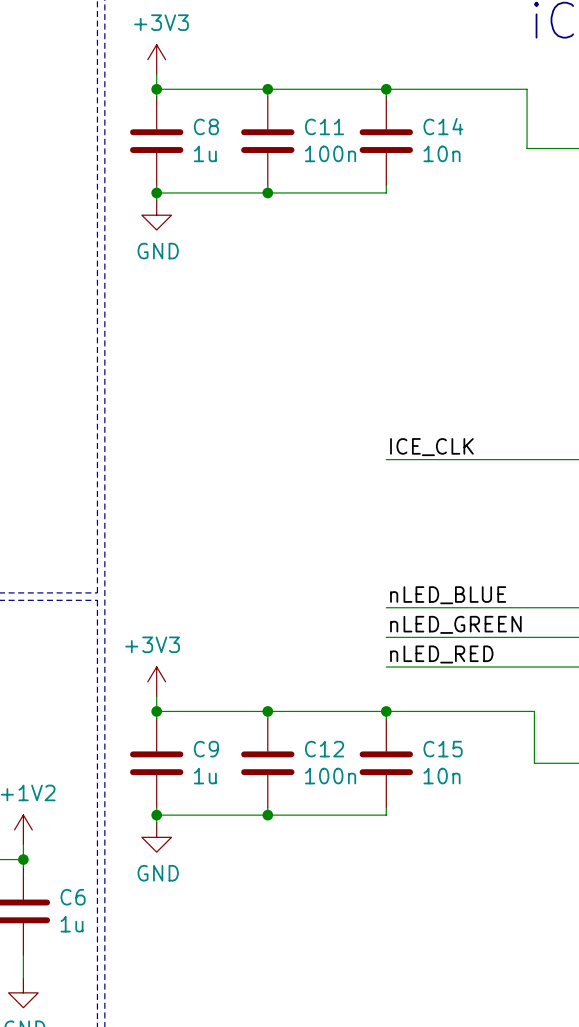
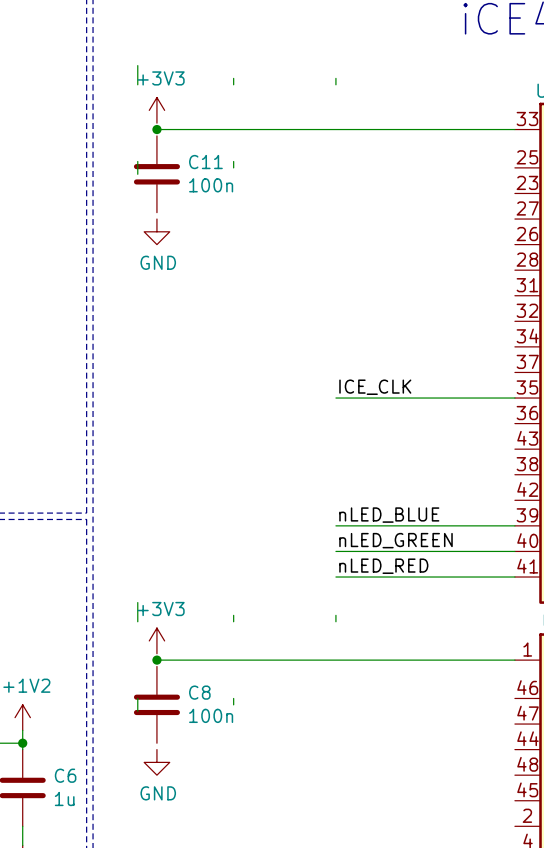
power symbol position: +3V3 (156, 59) -> +3V3 (156, 110)
wire: (156, 89) (527, 89) (527, 148) -> (156, 129) (457, 129)
junction: (156, 89) -> none
junction: (267, 89) -> none
junction: (386, 89) -> none
C8 position: (156, 141) -> (156, 704)
C11 position: (267, 141) -> (156, 174)
C14: 10n (386, 141) -> none
junction: none -> (156, 129)
C8 value: 1u (205, 153) -> 100n (211, 715)
wire: (386, 185) (386, 192) (156, 192) -> none
junction: (156, 192) -> none
junction: (267, 192) -> none
power symbol position: GND (156, 215) -> GND (156, 231)
power symbol text position: +3V3 (152, 644) -> +3V3 (161, 609)
power symbol position: +3V3 (156, 681) -> +3V3 (156, 640)
wire: (156, 711) (534, 711) (534, 763) -> (156, 660) (463, 660)
junction: (156, 711) -> none
junction: (267, 711) -> none
junction: (386, 711) -> none
C9: 1u (156, 763) -> none
junction: none -> (156, 660)
C12: 100n (267, 763) -> none
C15: 10n (386, 763) -> none
wire: (386, 807) (386, 815) (156, 815) -> none
junction: (156, 815) -> none
junction: (267, 815) -> none
power symbol position: GND (156, 837) -> GND (156, 762)

